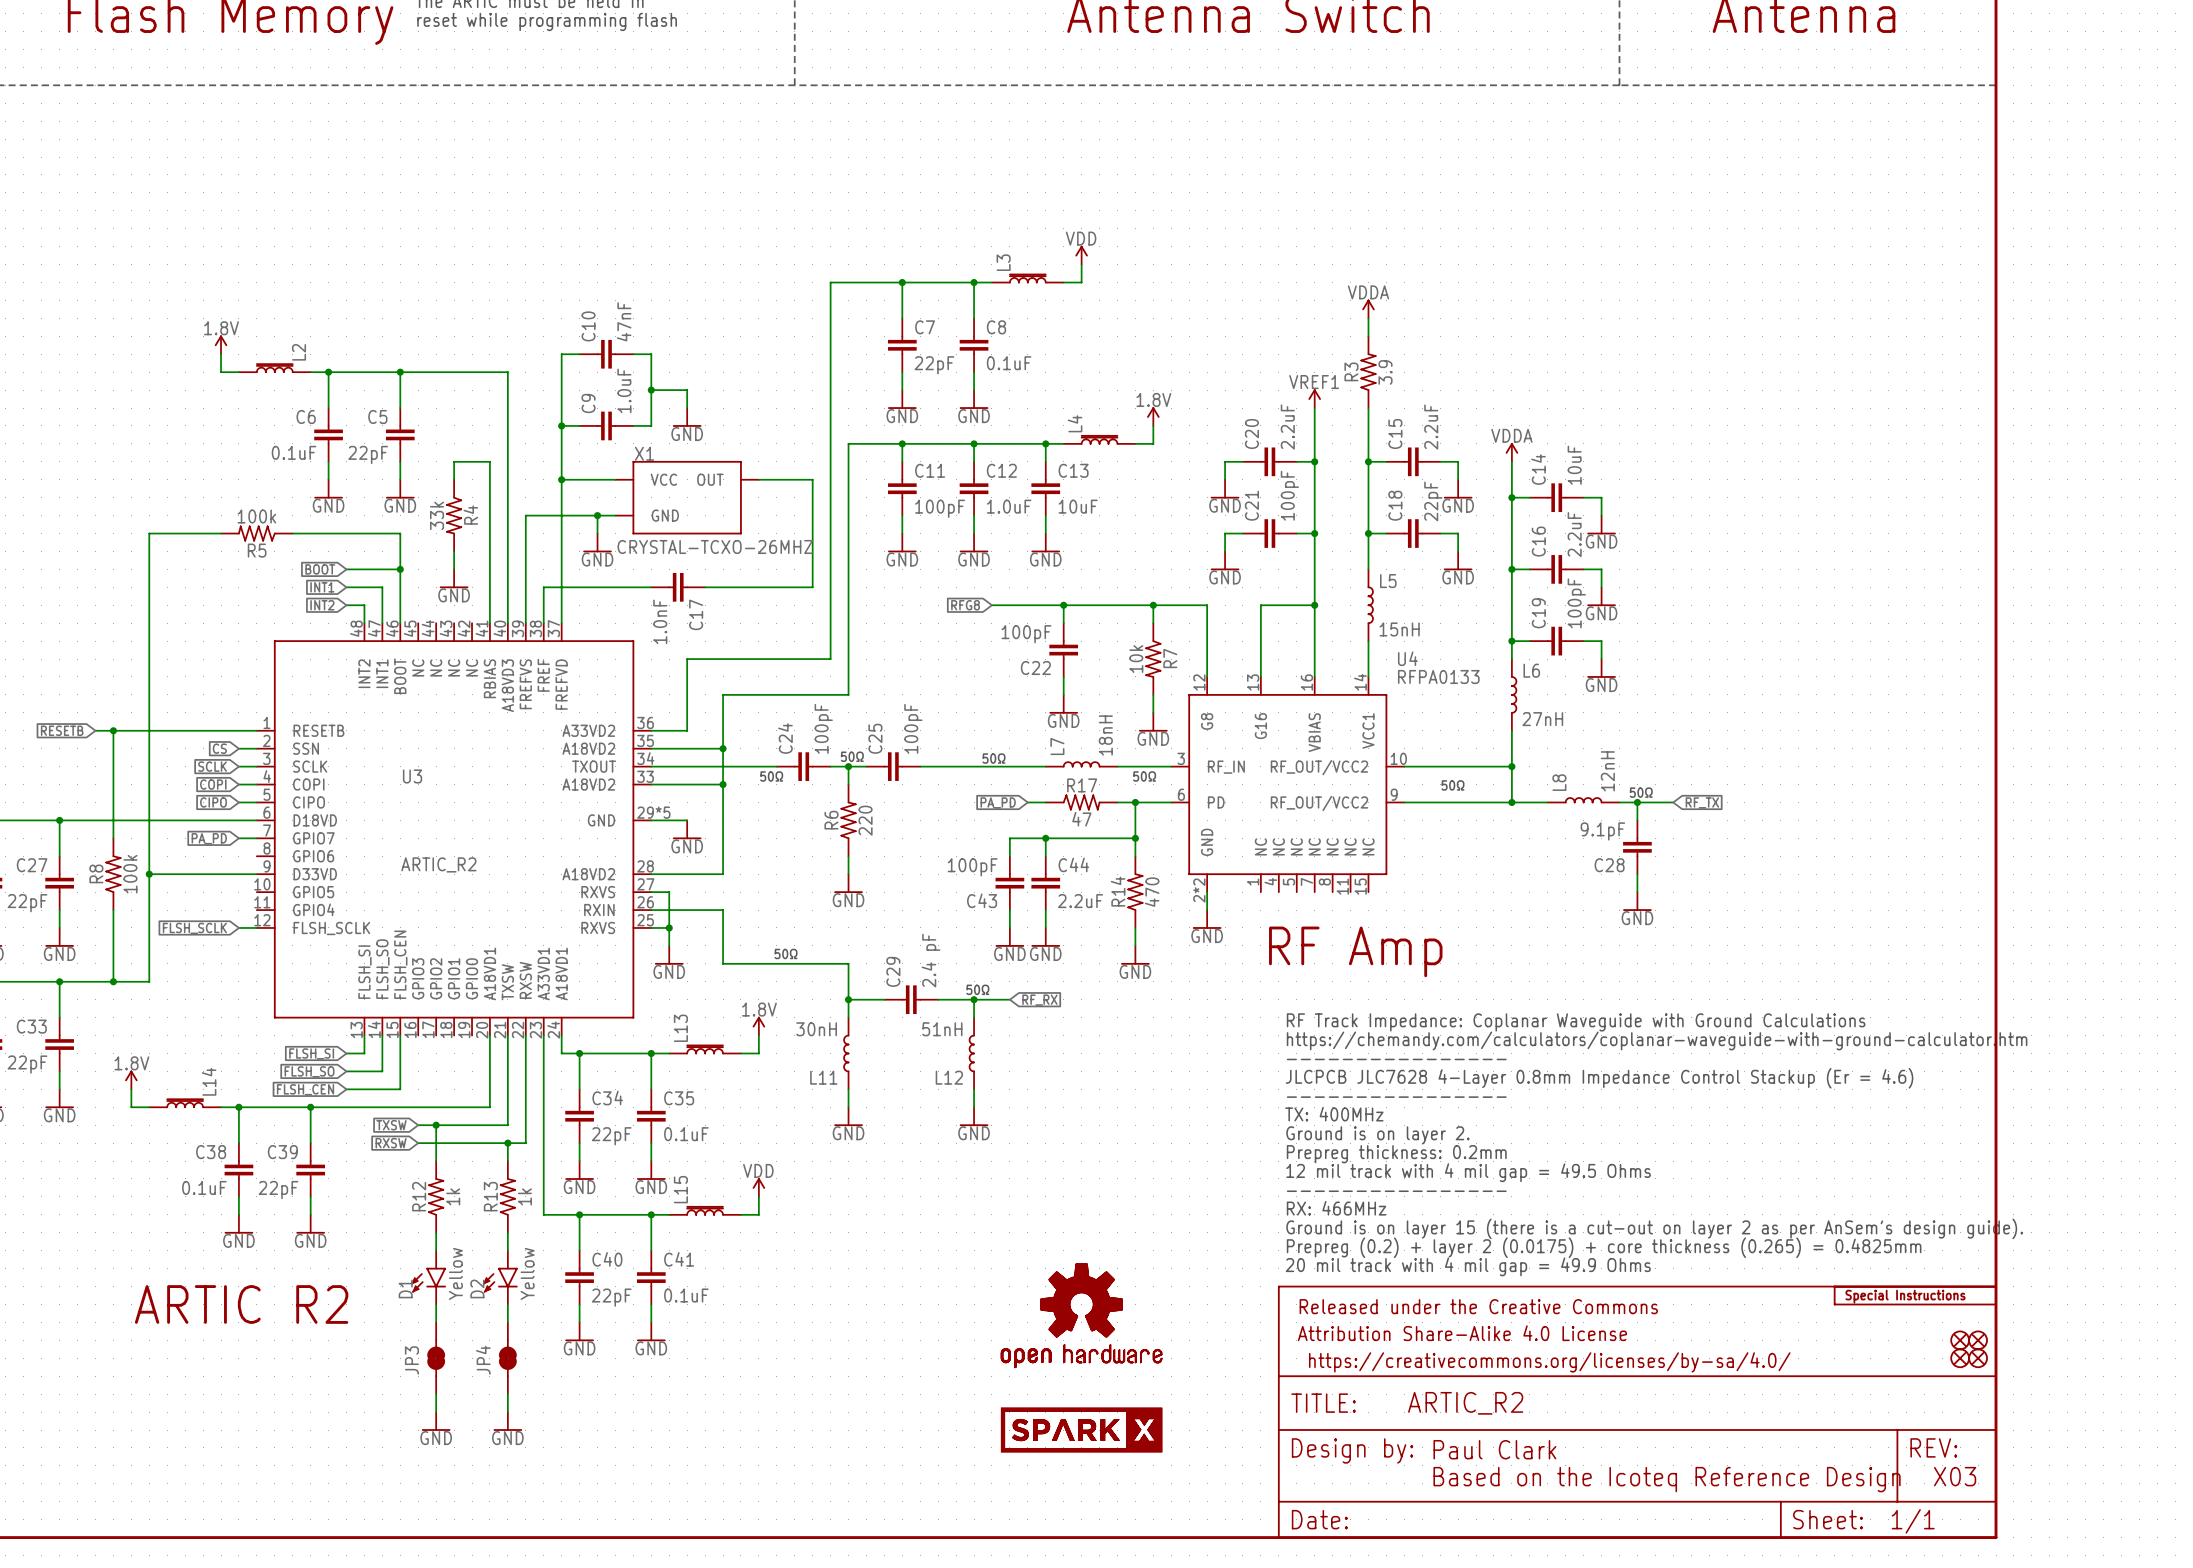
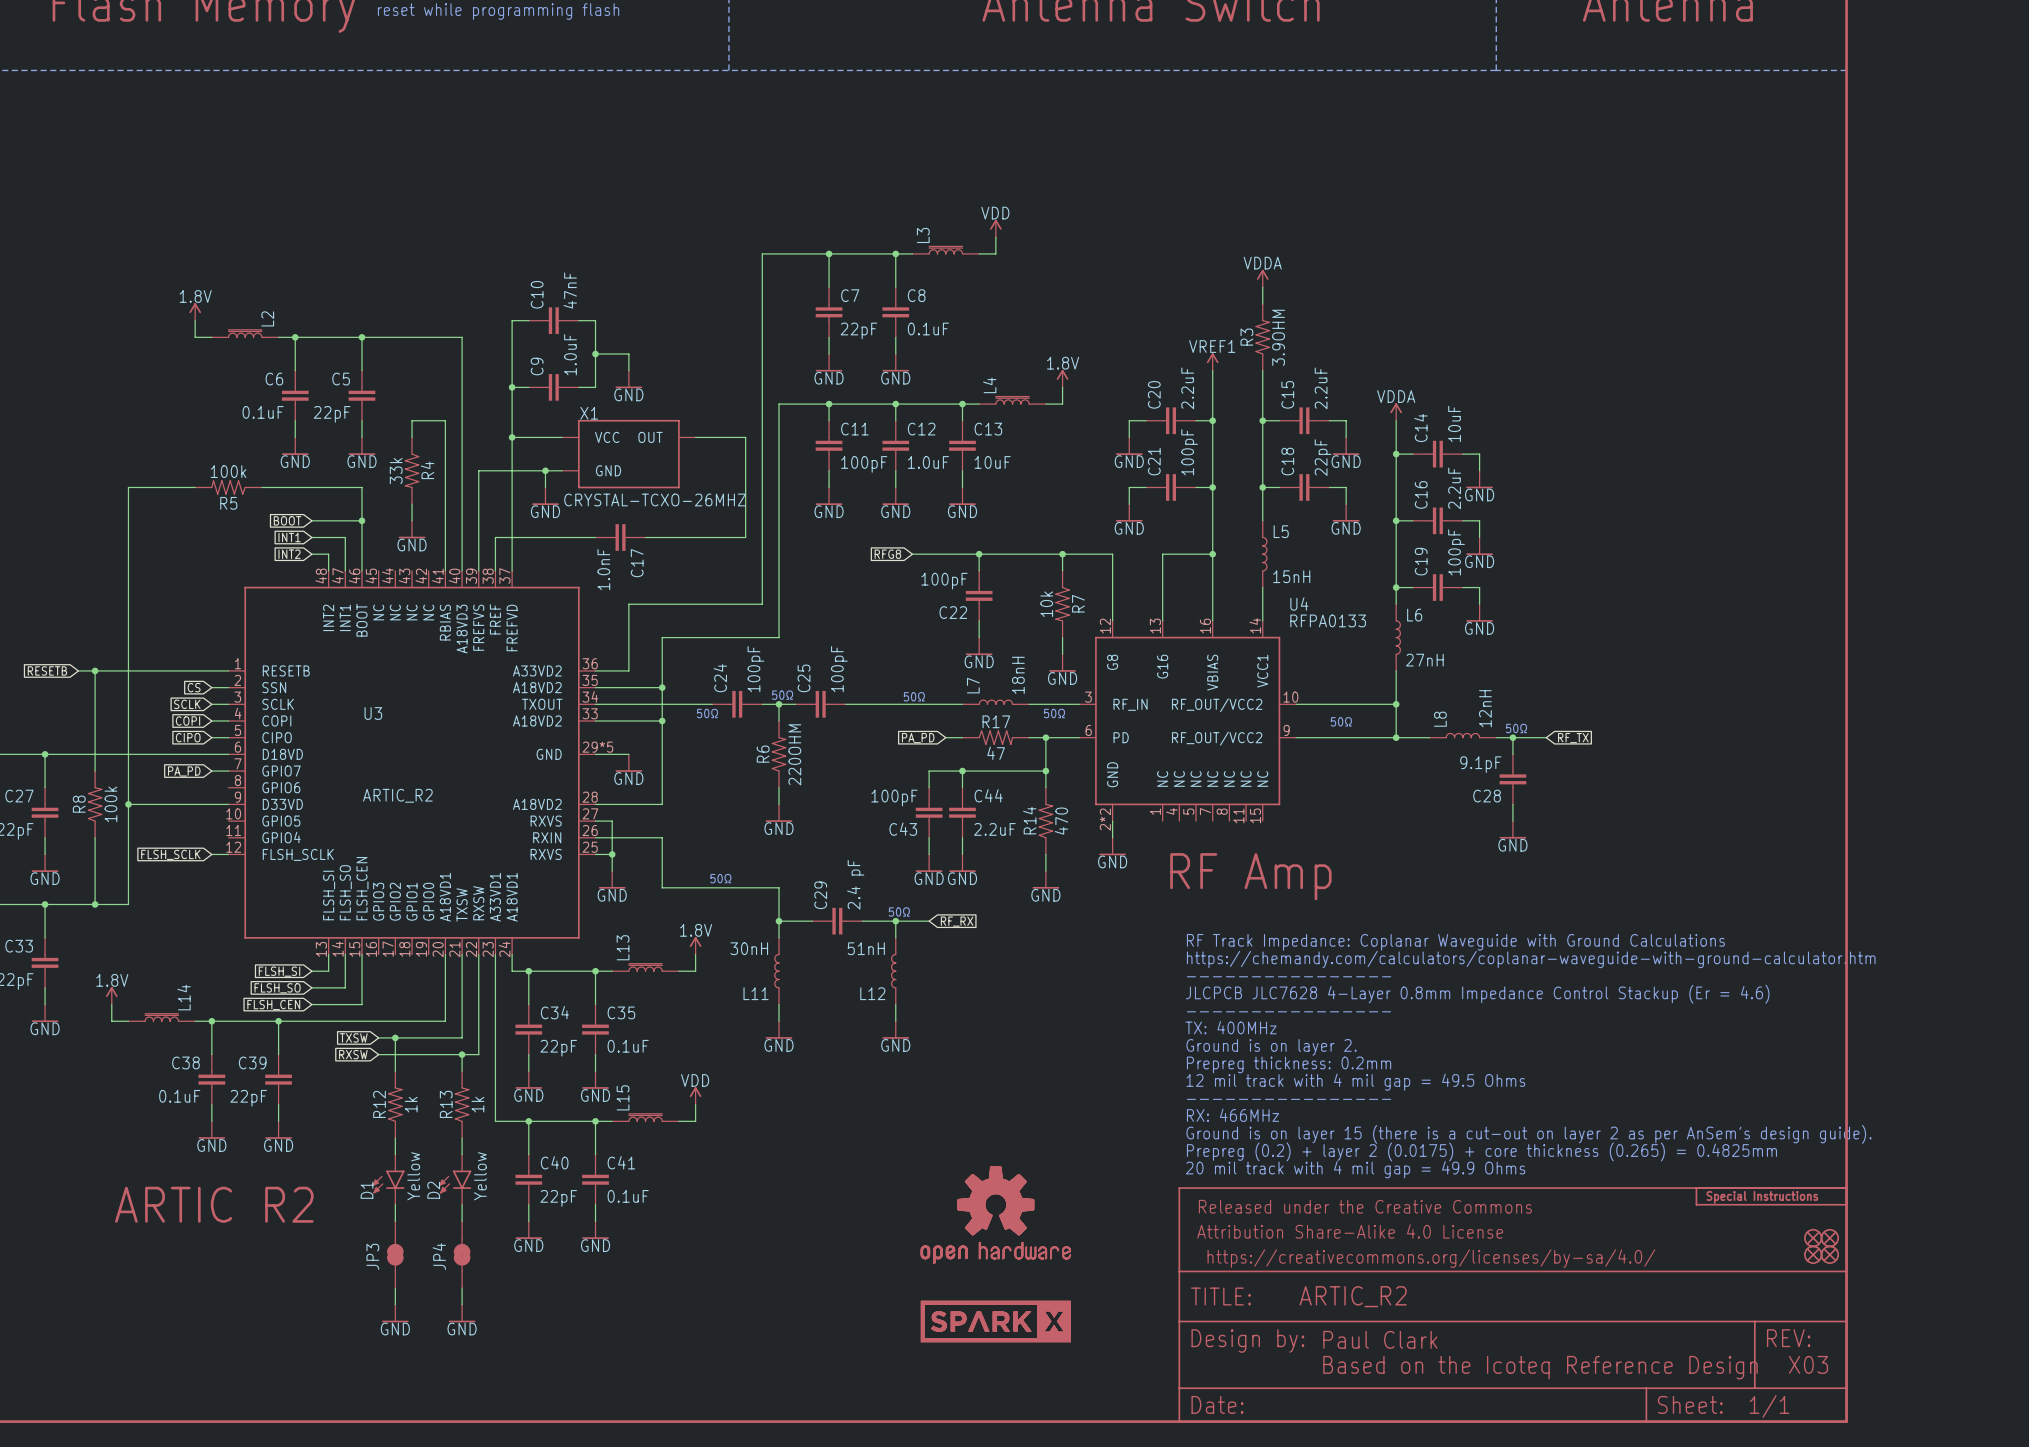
R3 value: 3.9 (1385, 372) -> 3.9OHM (1278, 337)
R6 value: 220 (865, 820) -> 220OHM (794, 754)

